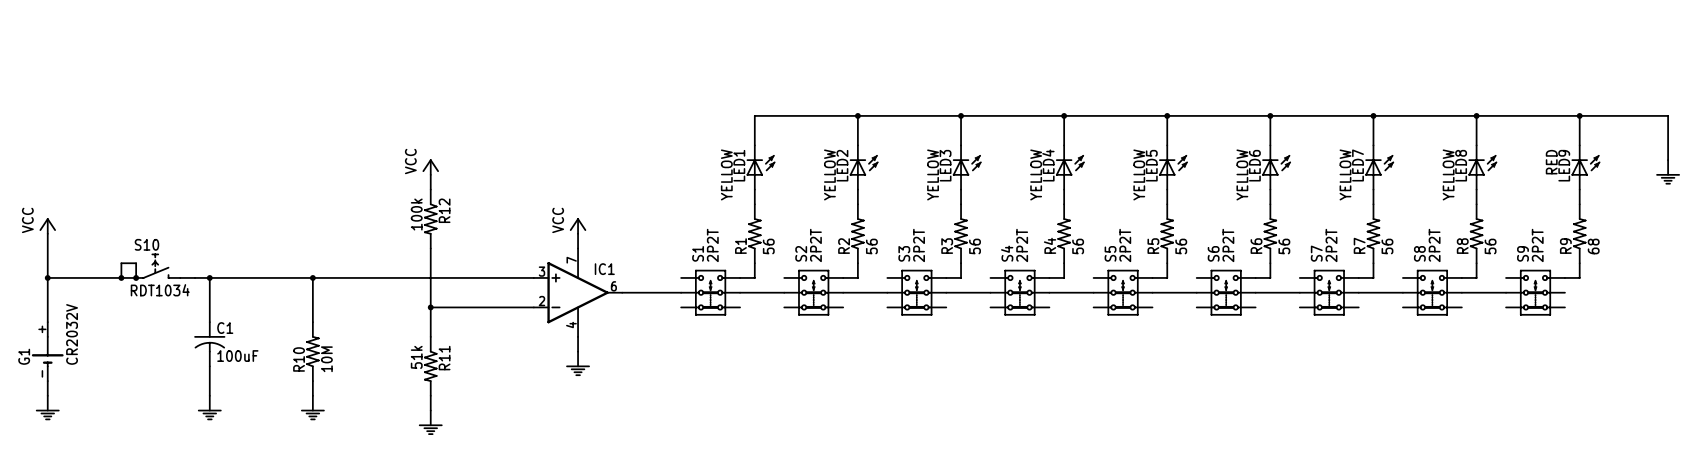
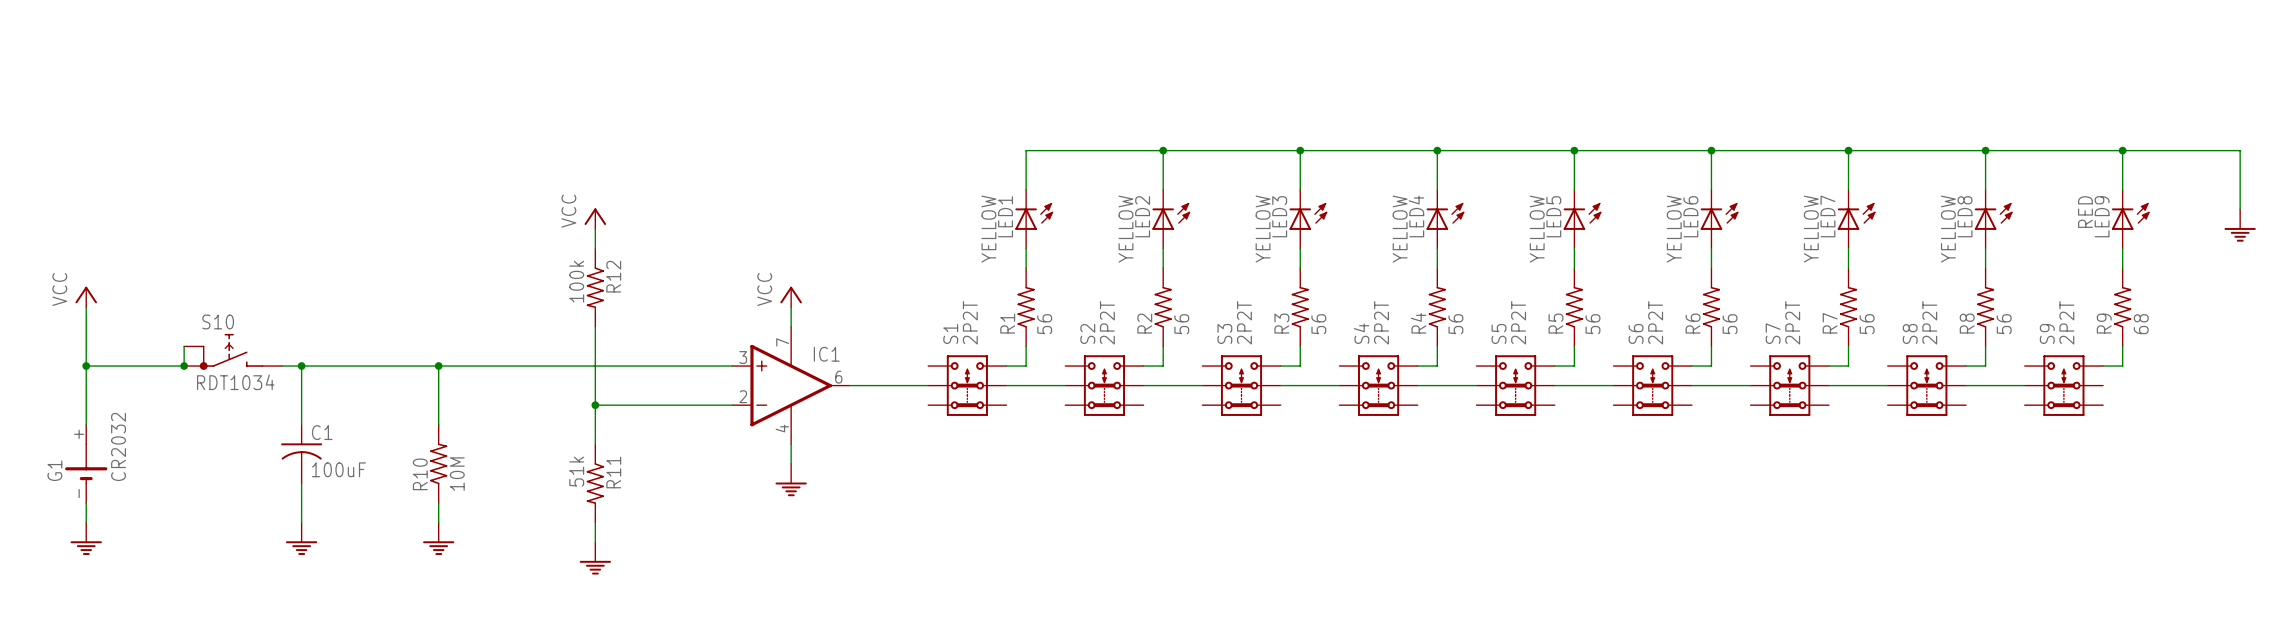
G1 value: CR2032V (72, 334) -> CR2032 (118, 446)

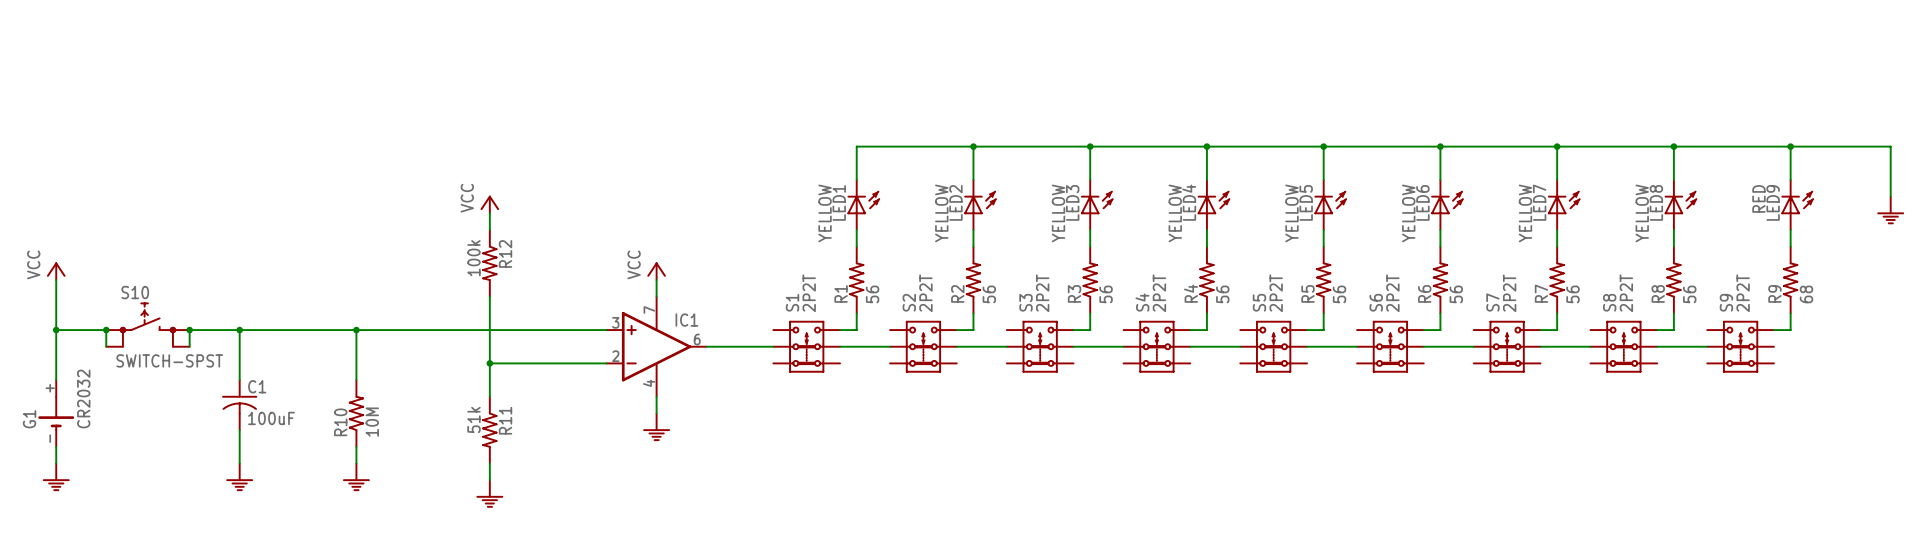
S10 symbol: [184, 333, 283, 370] -> [106, 302, 190, 348]
wire: (184, 346) (184, 366) (144, 366) -> (106, 346) (106, 330)
junction: none -> (106, 330)
junction: (184, 366) -> none
junction: none -> (189, 330)
S10 value: RDT1034 (235, 382) -> SWITCH-SPST (169, 360)

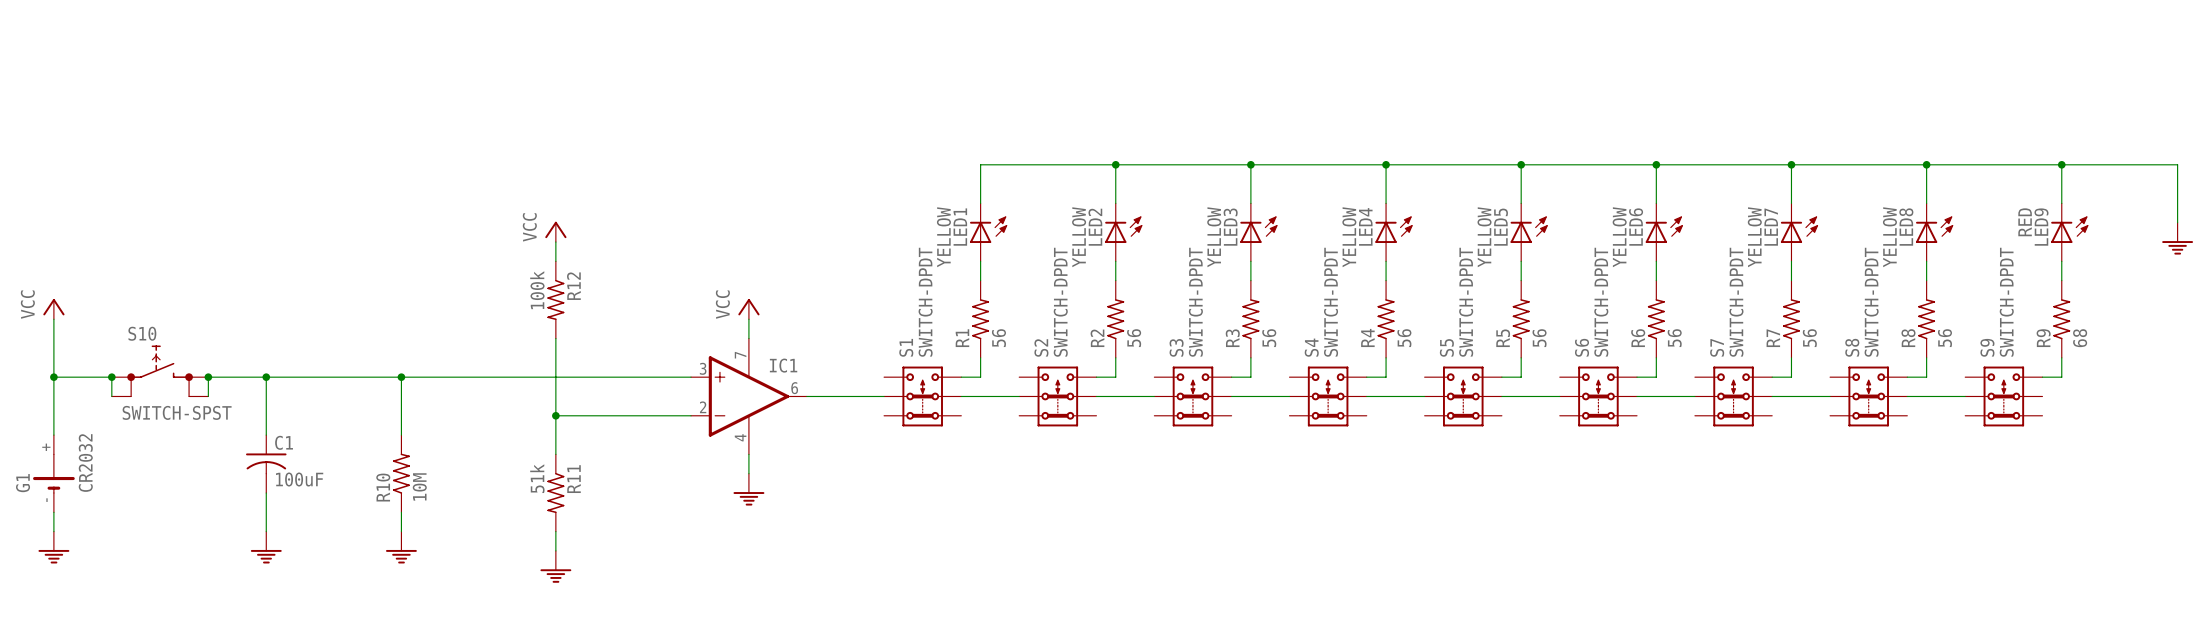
S1 value: 2P2T (809, 293) -> SWITCH-DPDT (925, 302)
S2 value: 2P2T (925, 293) -> SWITCH-DPDT (1060, 302)
S3 value: 2P2T (1042, 293) -> SWITCH-DPDT (1195, 302)
S4 value: 2P2T (1159, 293) -> SWITCH-DPDT (1331, 302)
S5 value: 2P2T (1276, 293) -> SWITCH-DPDT (1466, 302)
S6 value: 2P2T (1392, 293) -> SWITCH-DPDT (1601, 302)
S7 value: 2P2T (1509, 293) -> SWITCH-DPDT (1736, 302)
S8 value: 2P2T (1626, 293) -> SWITCH-DPDT (1871, 302)
S9 value: 2P2T (1743, 293) -> SWITCH-DPDT (2006, 302)

